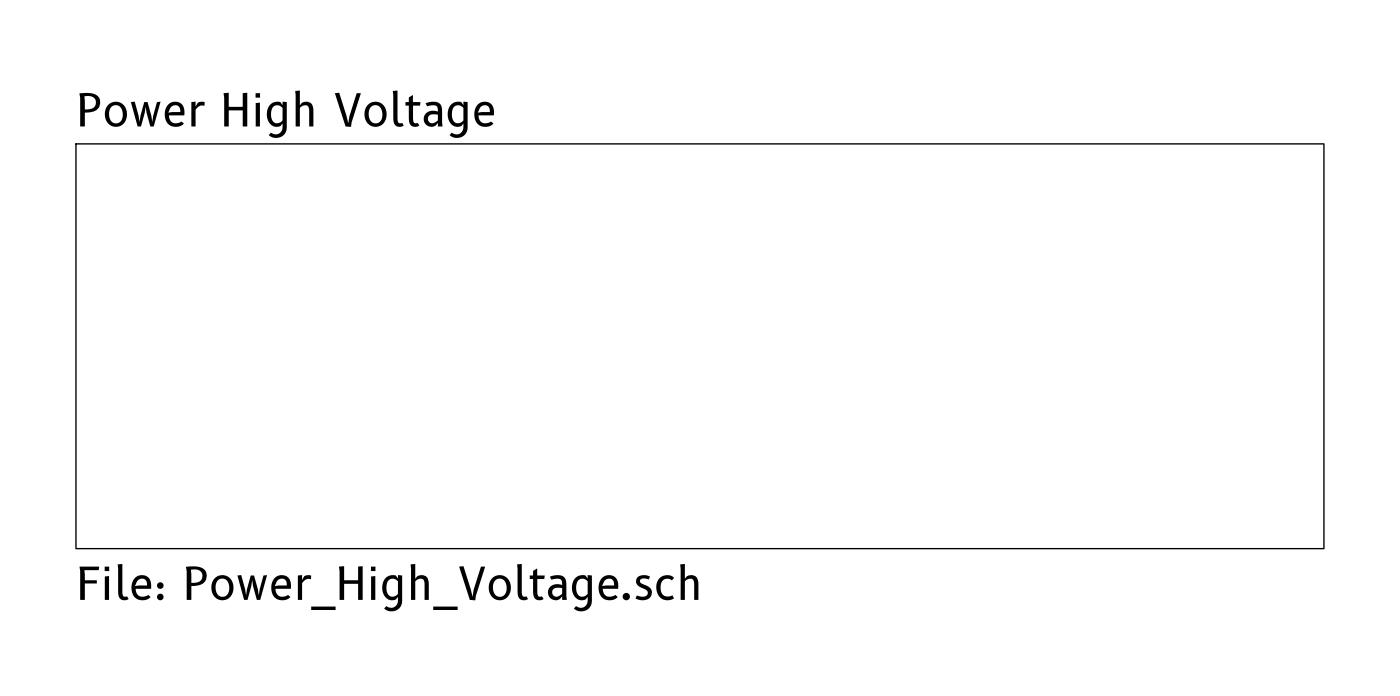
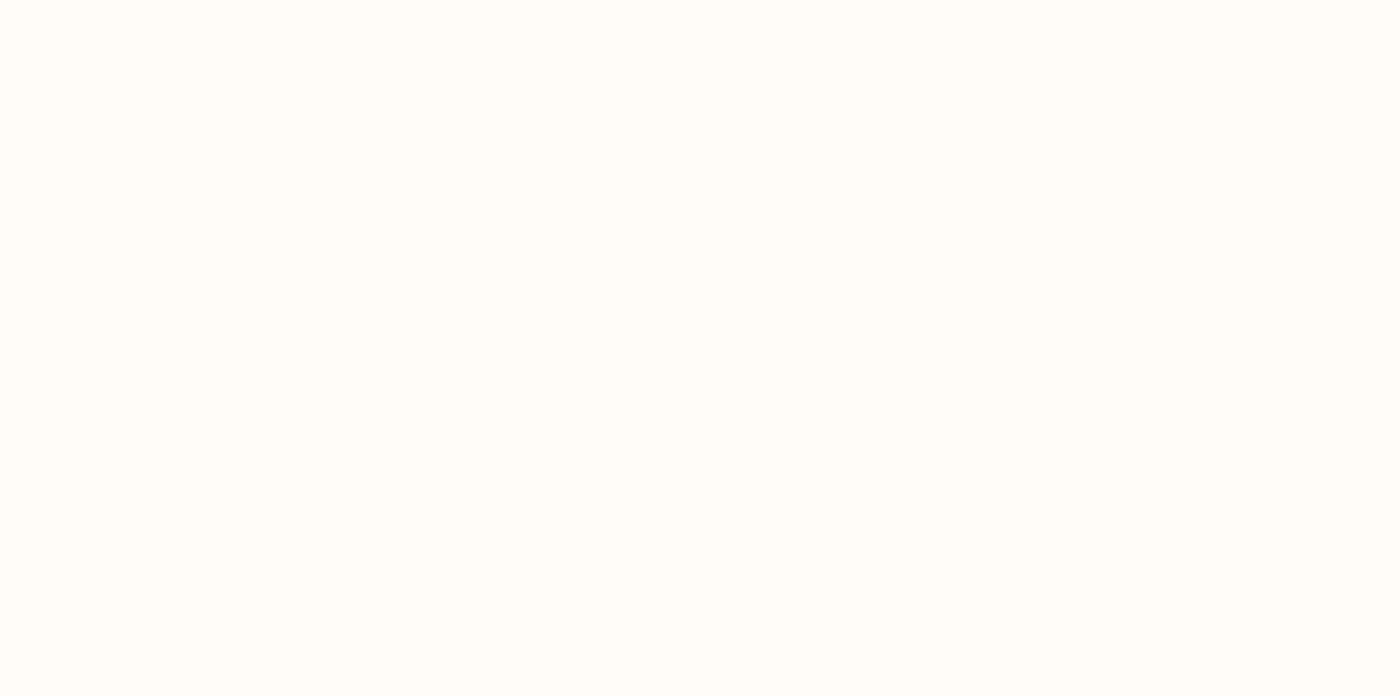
sheet Power High Voltage: File: Power_High_Voltage.sch (699, 346) -> none

